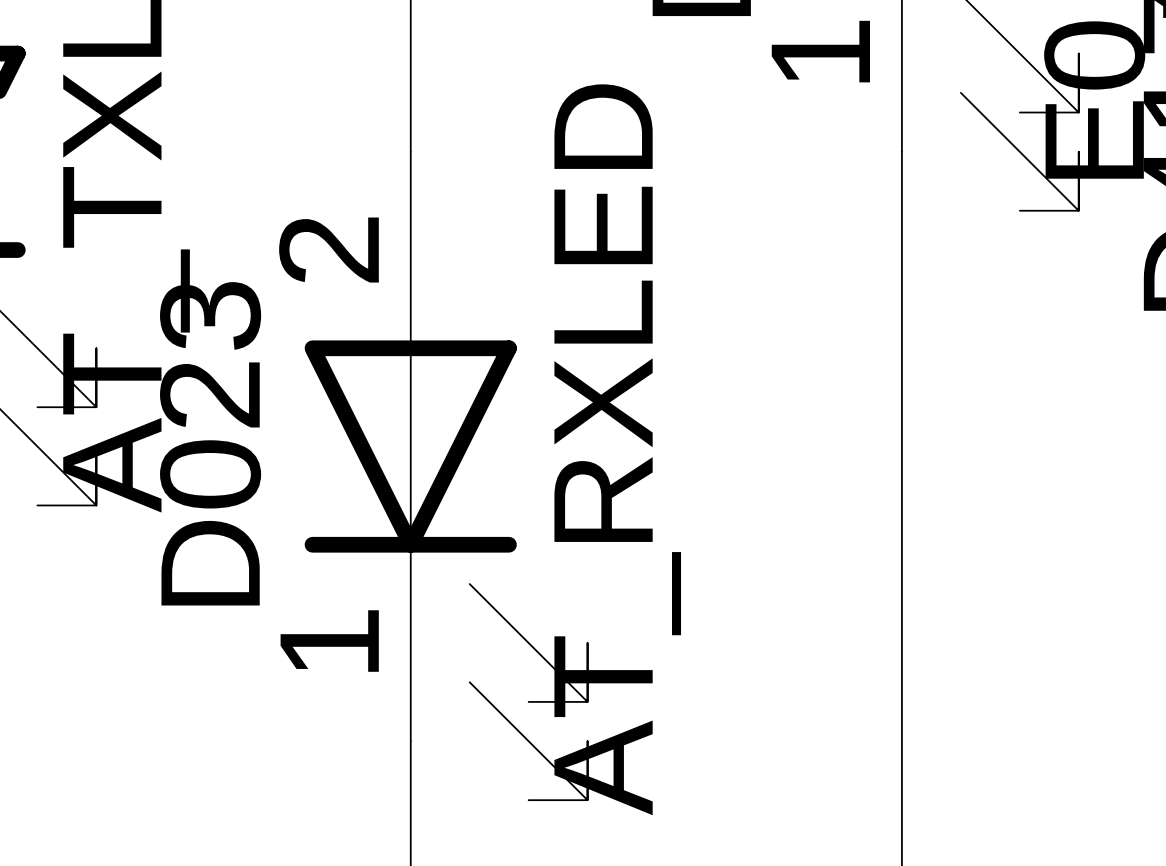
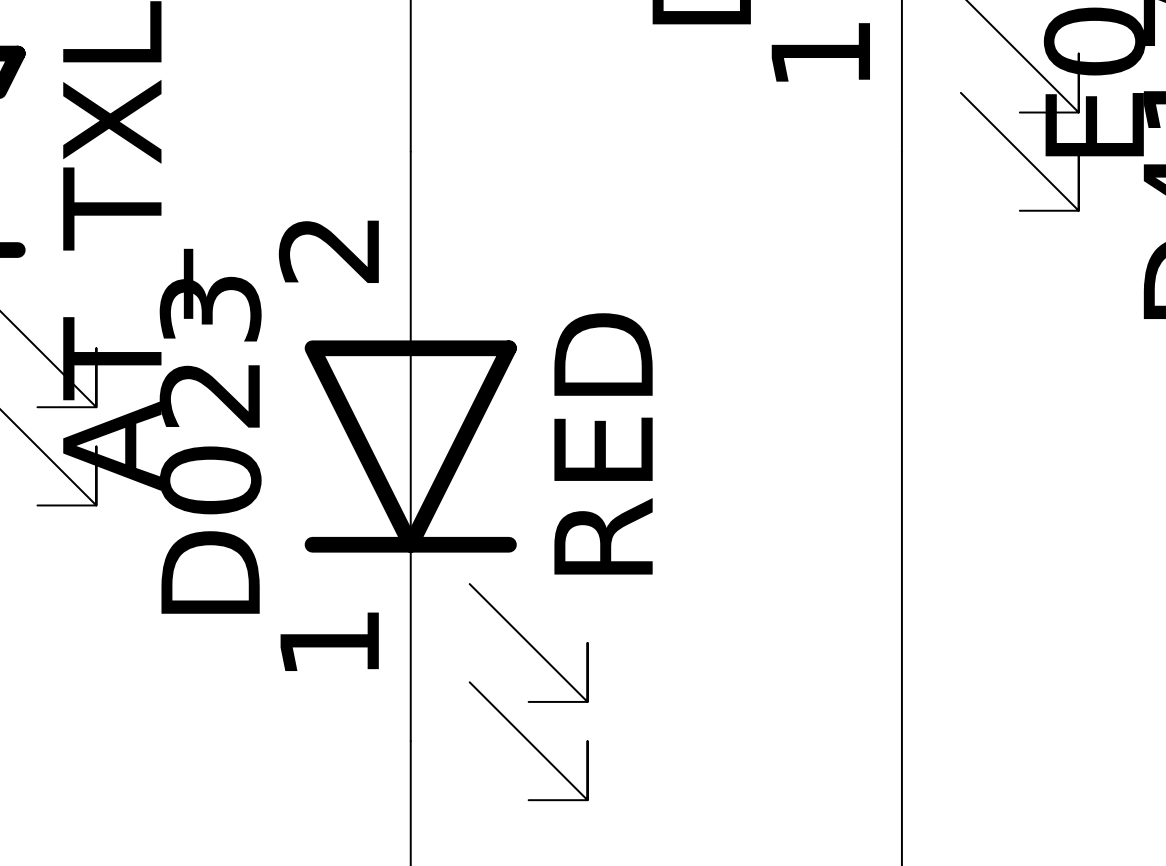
D023 value: AT_RXLED (617, 449) -> RED (603, 443)

